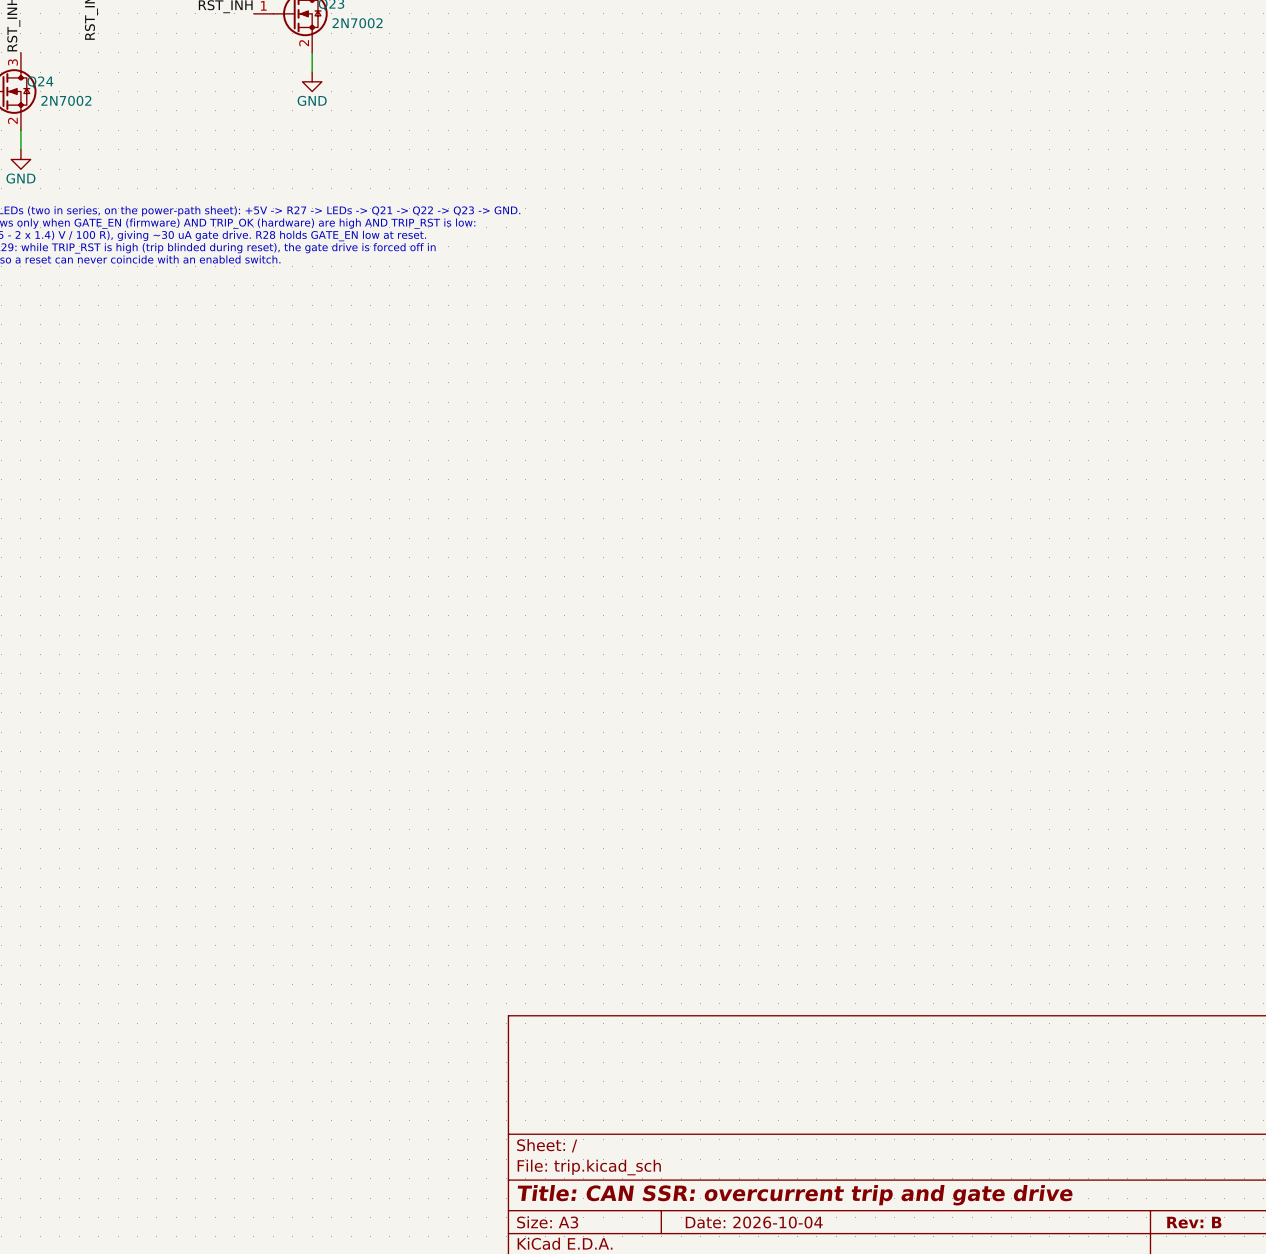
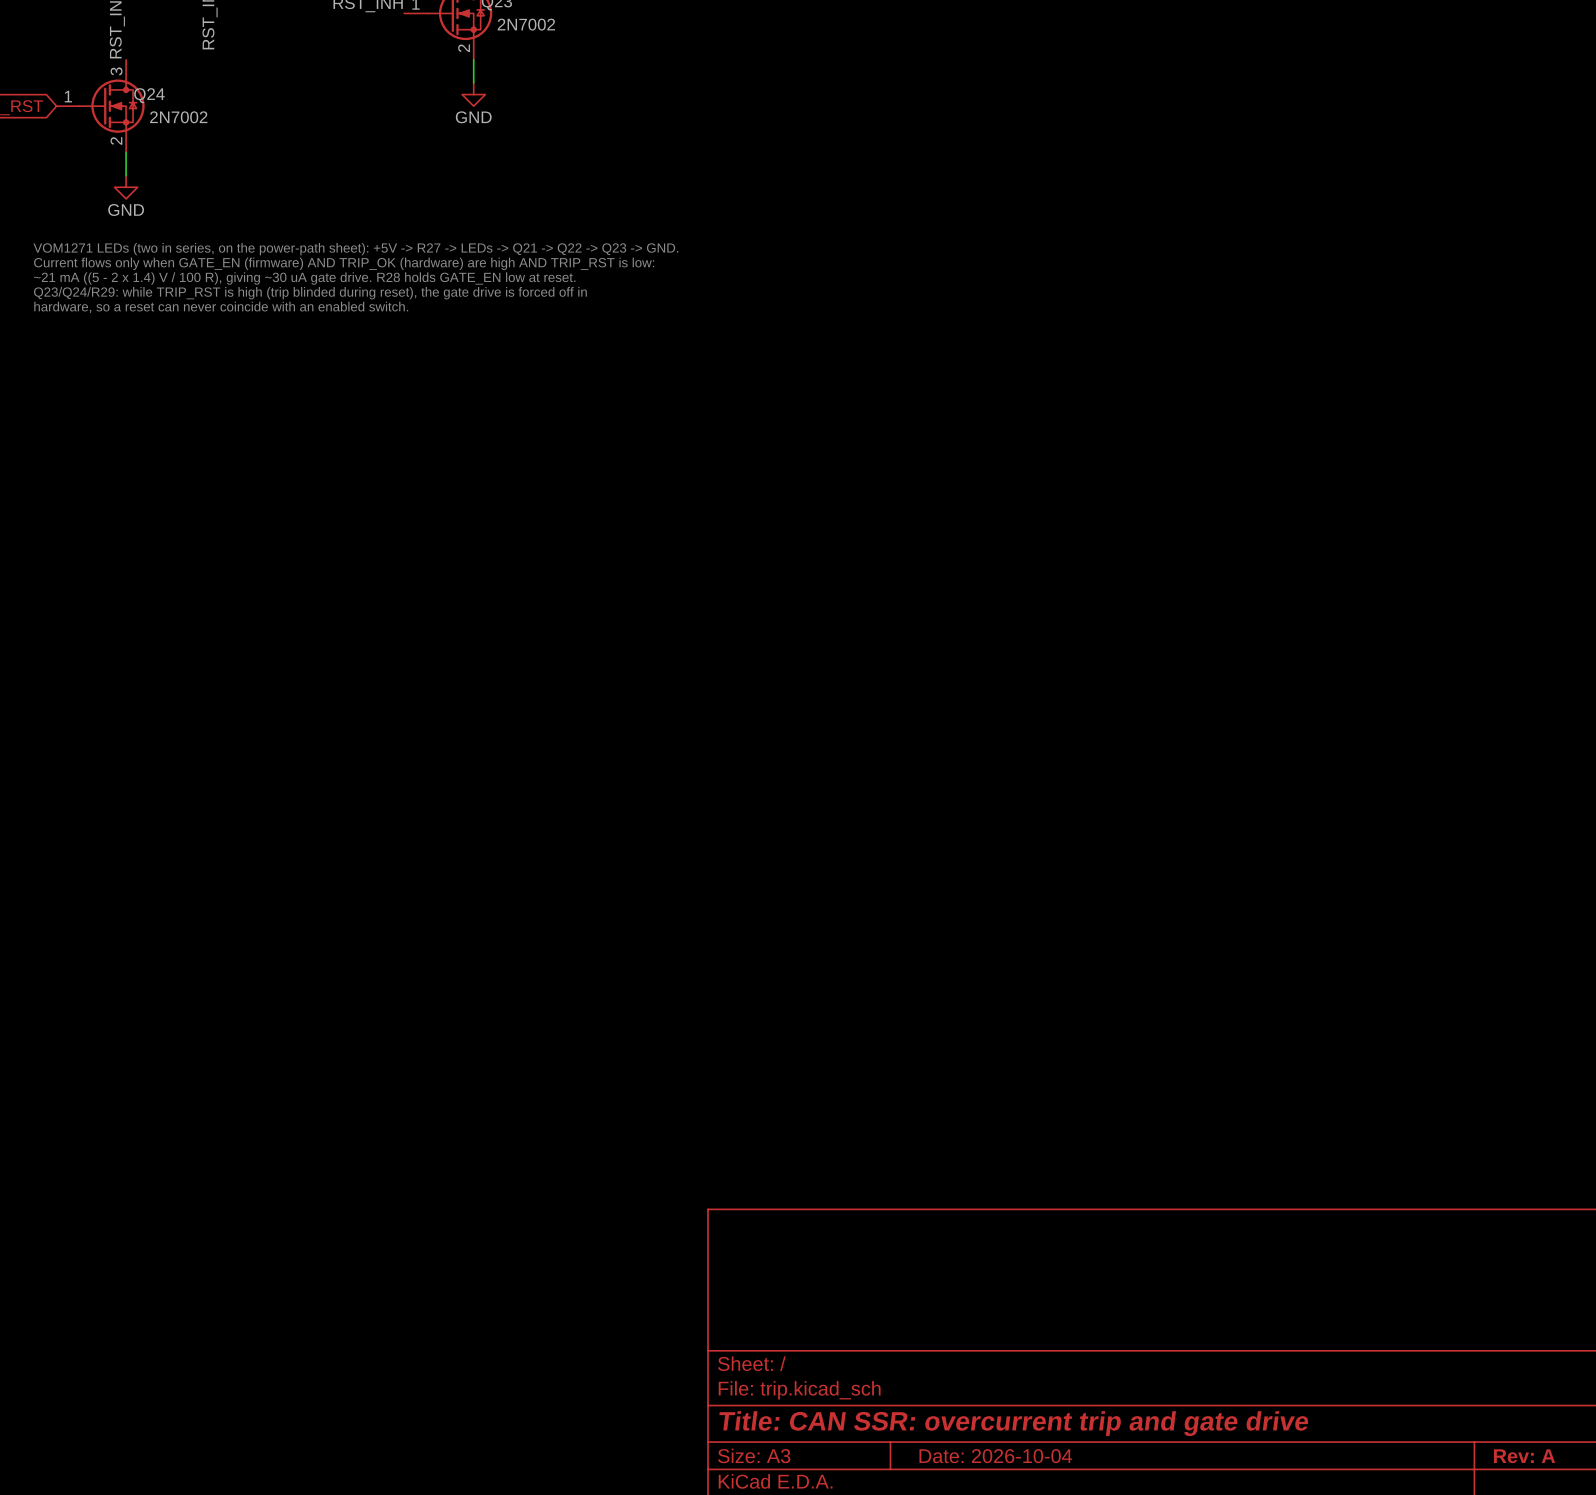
title block: Rev: B (1194, 1222) -> Rev: A (1524, 1456)

